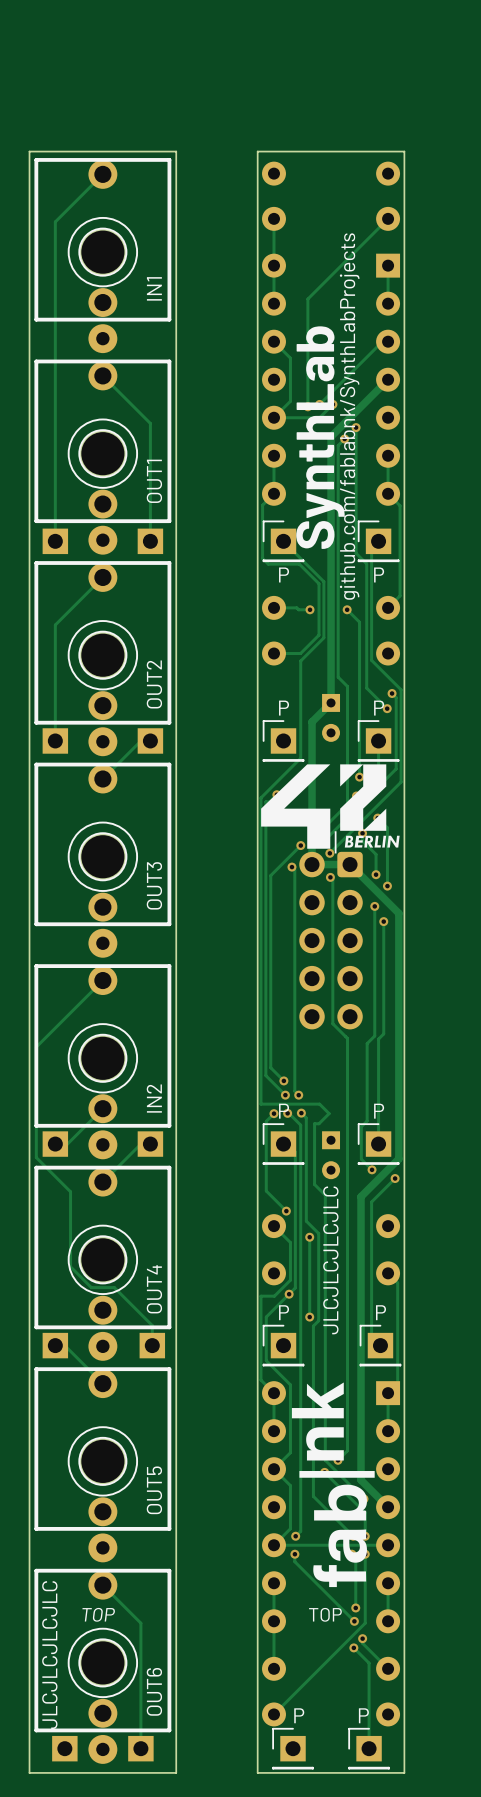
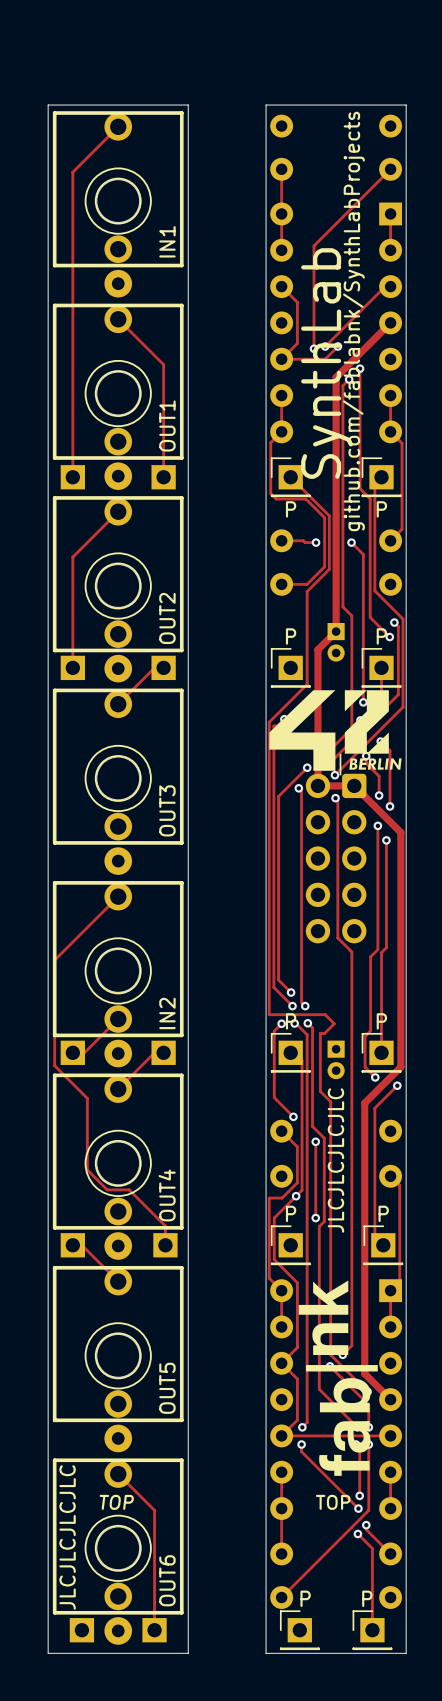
part footprint: [322, 693, 341, 742] -> [327, 623, 345, 662]
part footprint: [322, 1131, 341, 1180] -> [327, 1040, 345, 1080]

